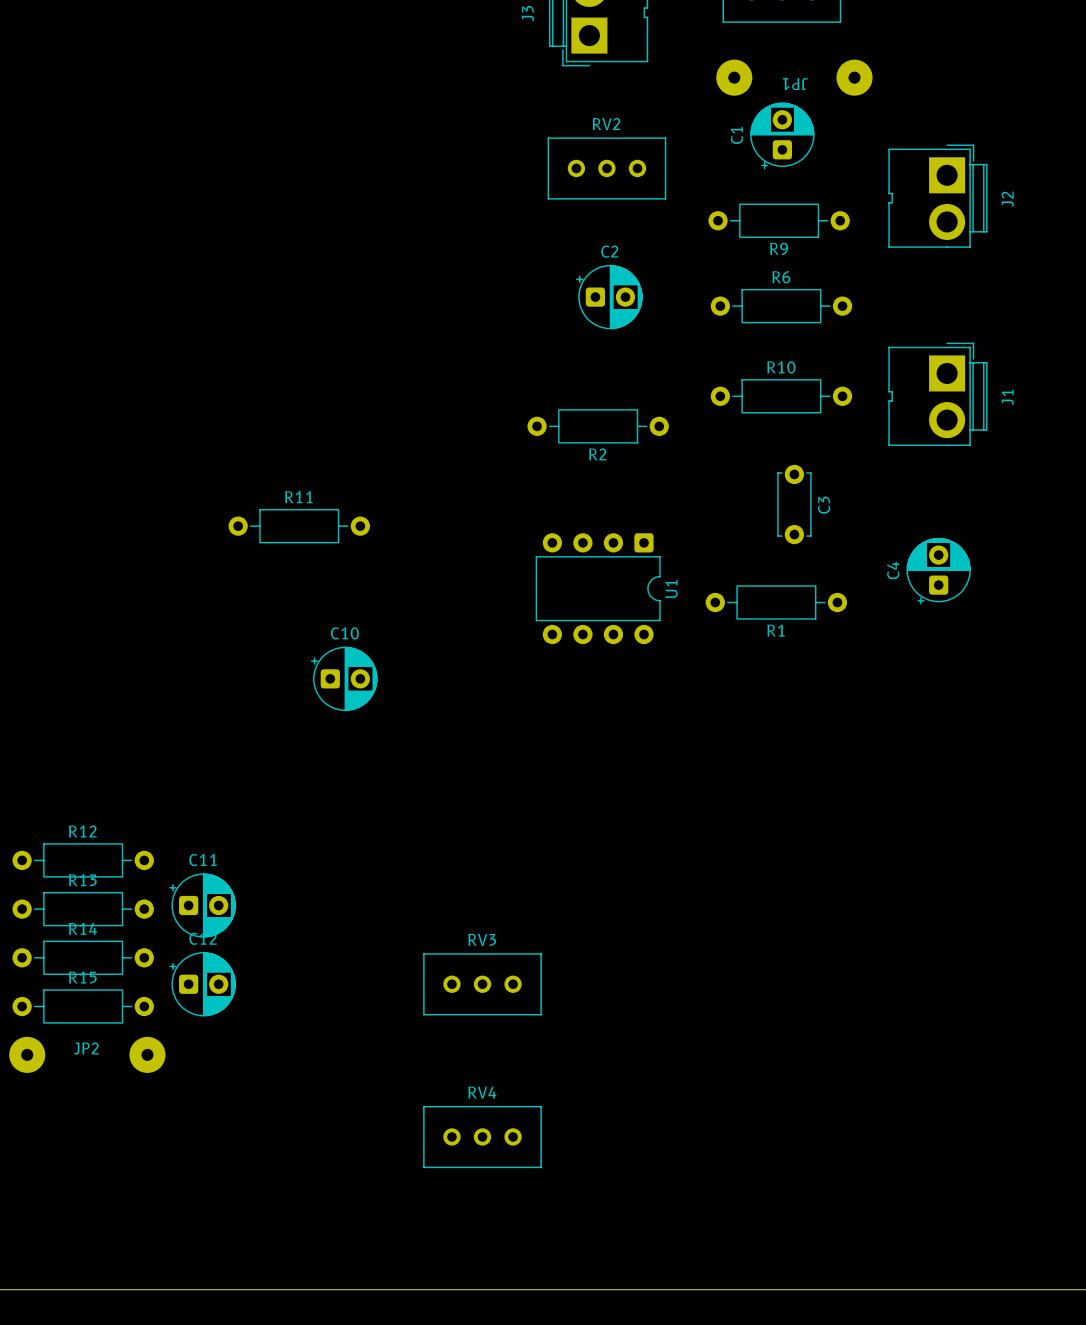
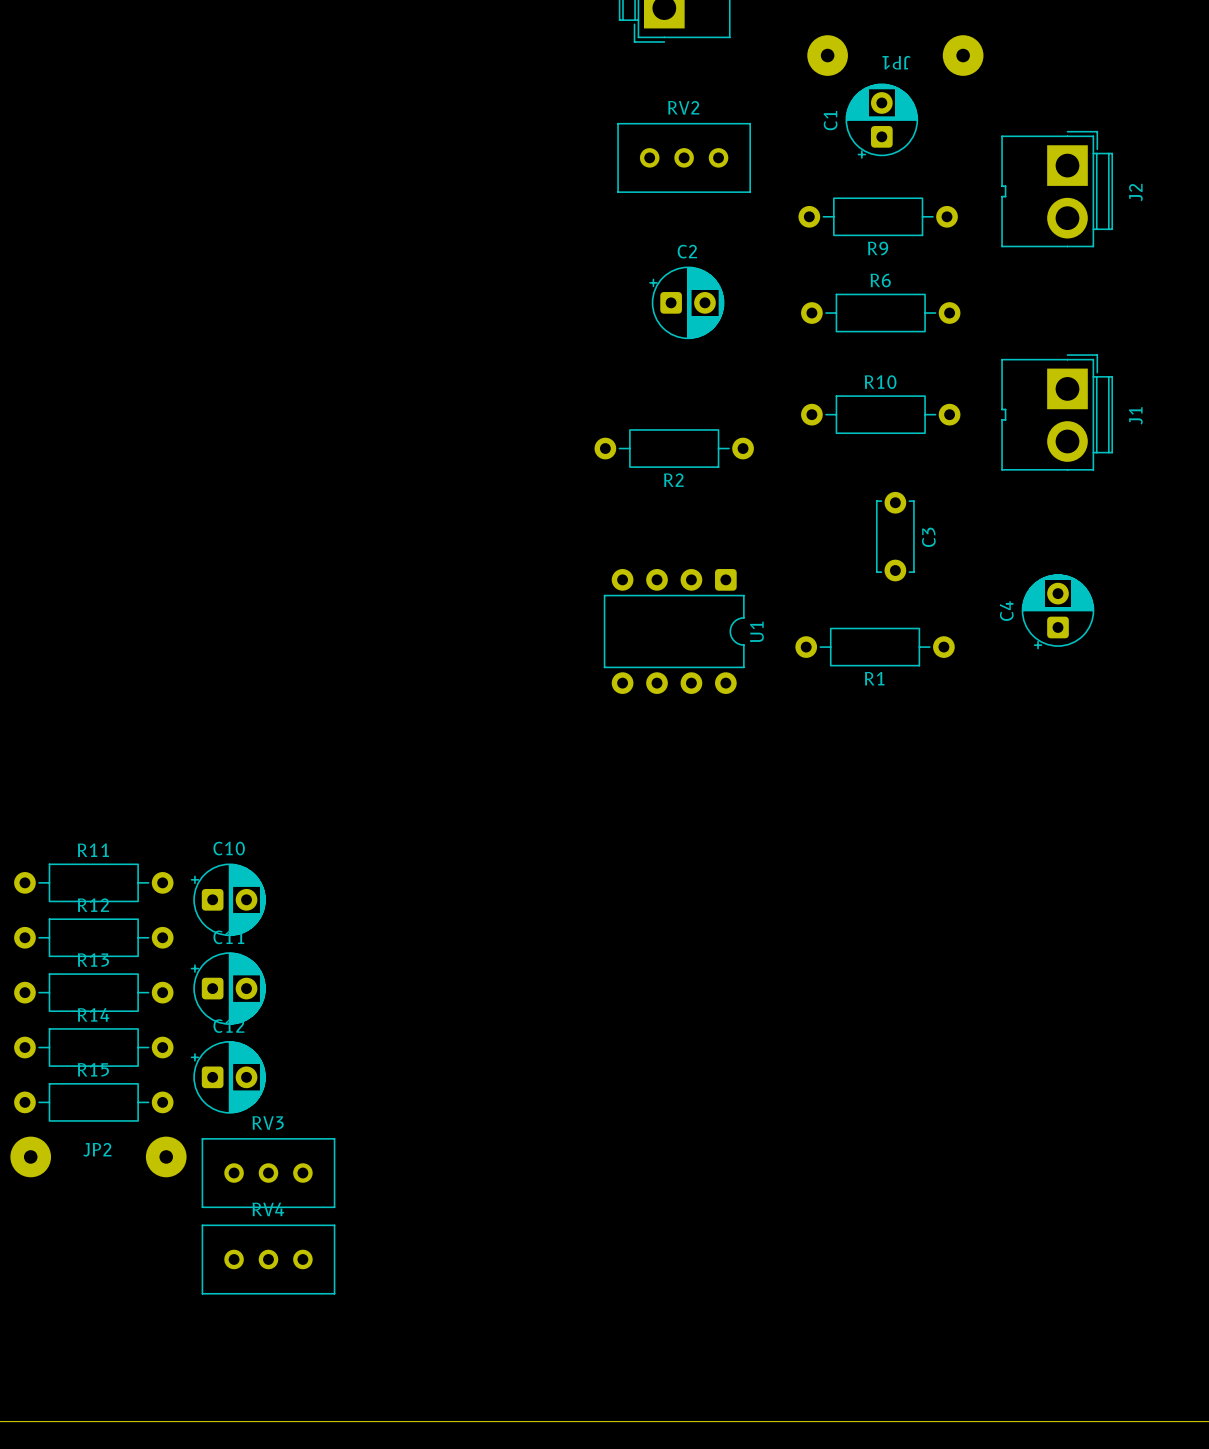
R11 position: (299, 526) -> (93, 882)
C10 position: (344, 678) -> (228, 899)
RV3 position: (482, 984) -> (268, 1173)
RV4 position: (482, 1137) -> (268, 1259)

